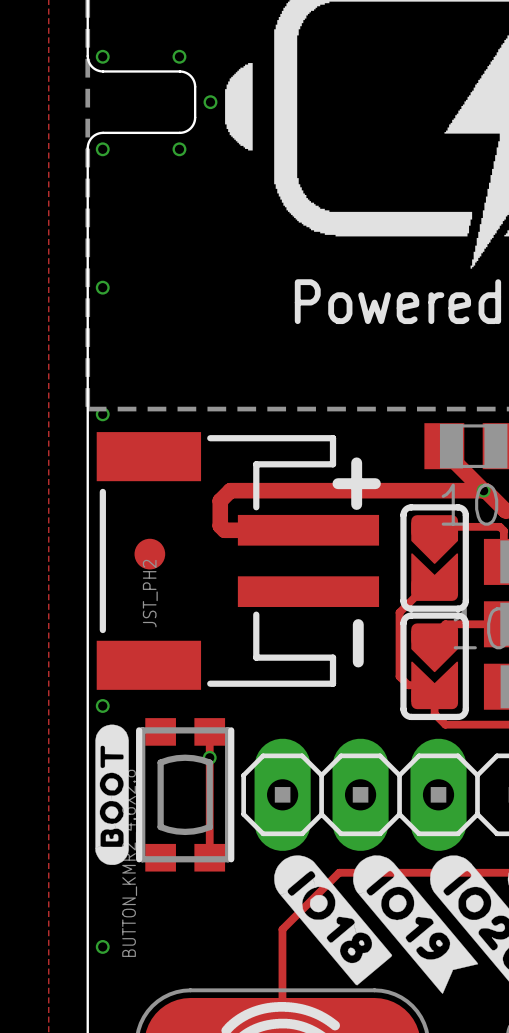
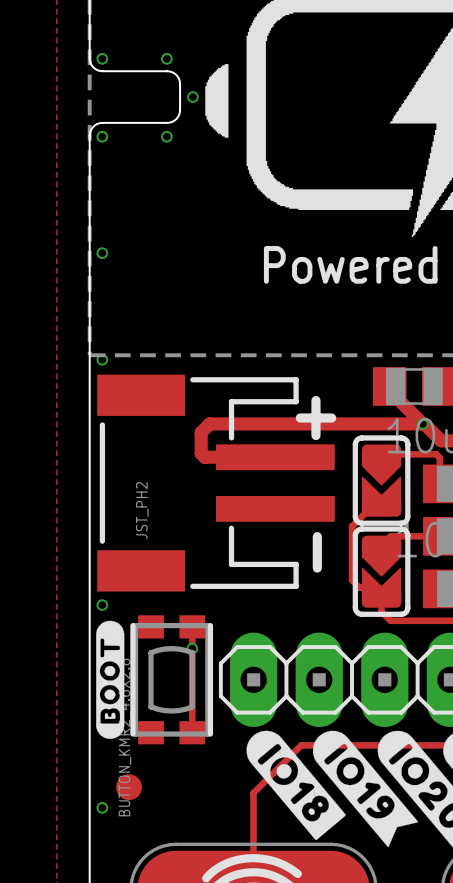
part position: (149, 554) -> (129, 787)

